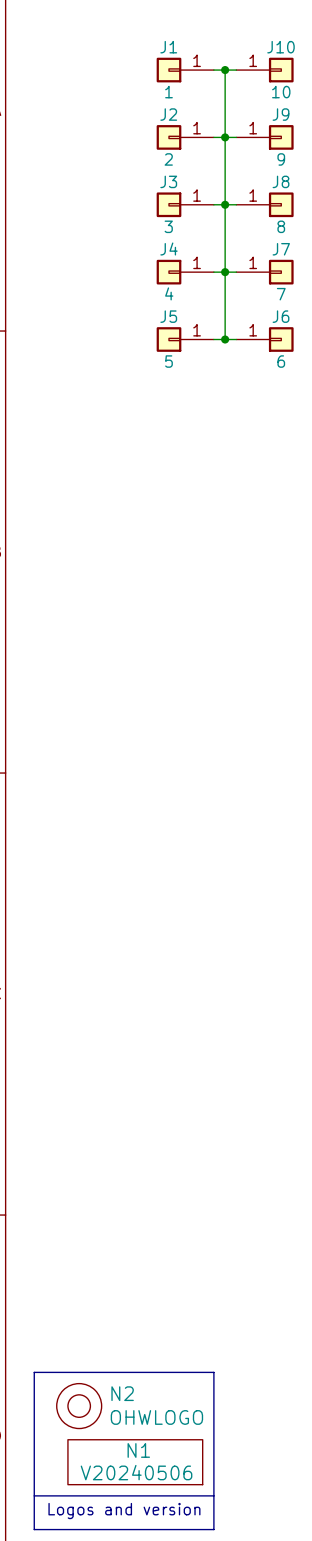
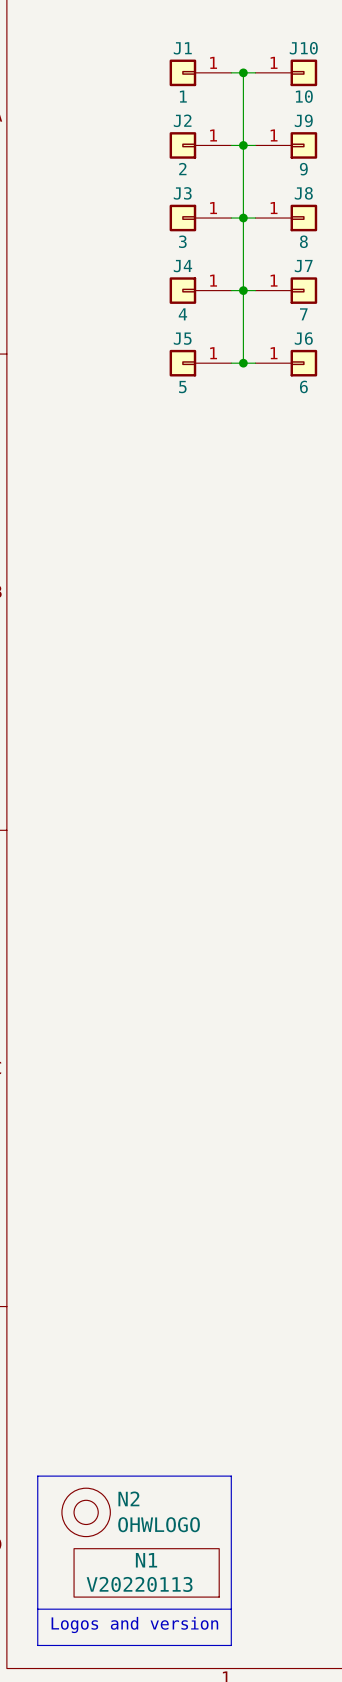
N1 value: V20240506 (136, 1472) -> V20220113 (139, 1584)

